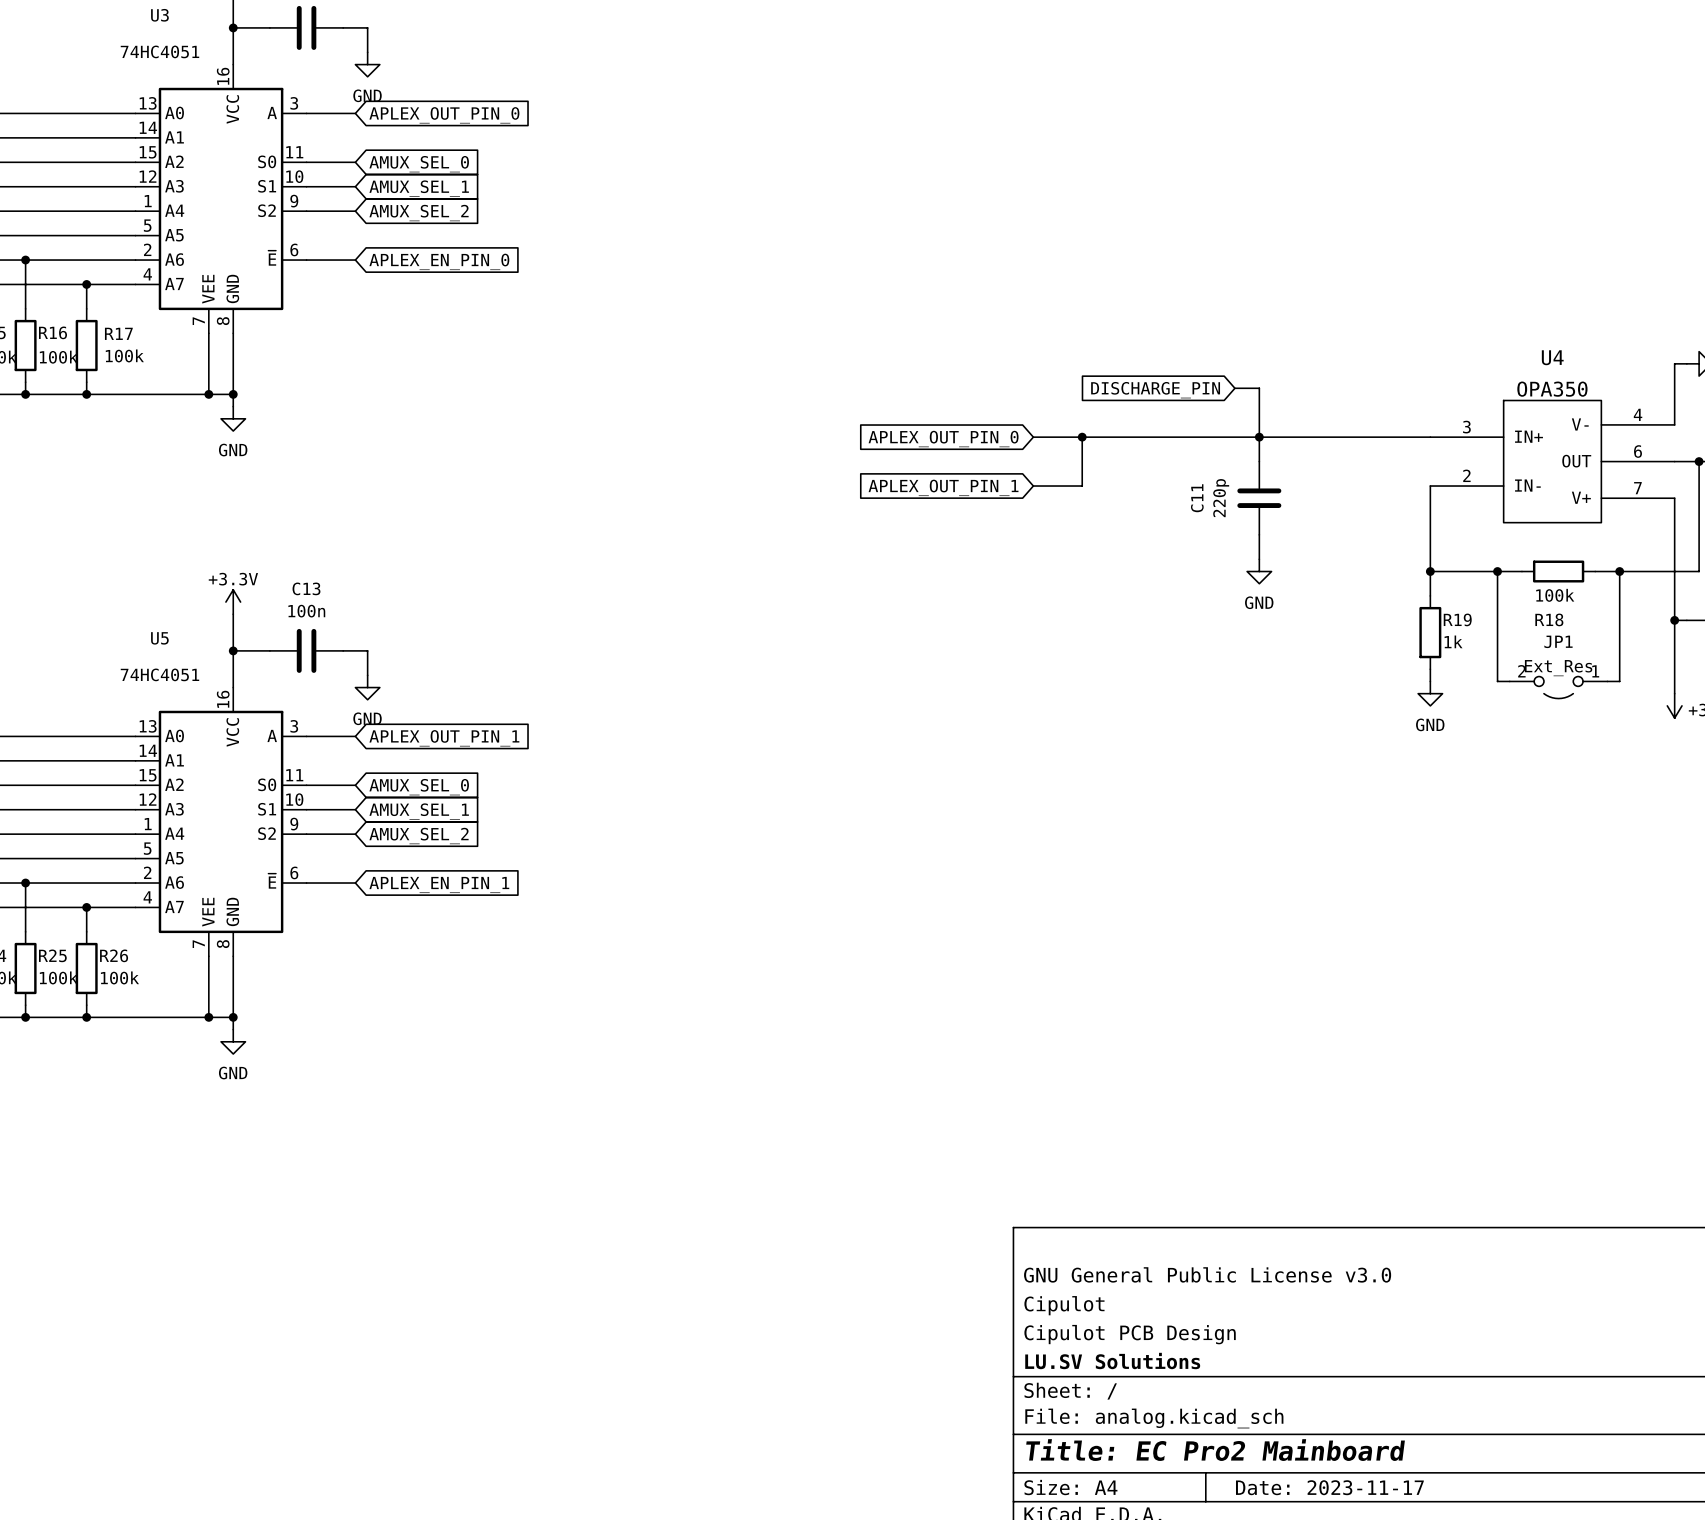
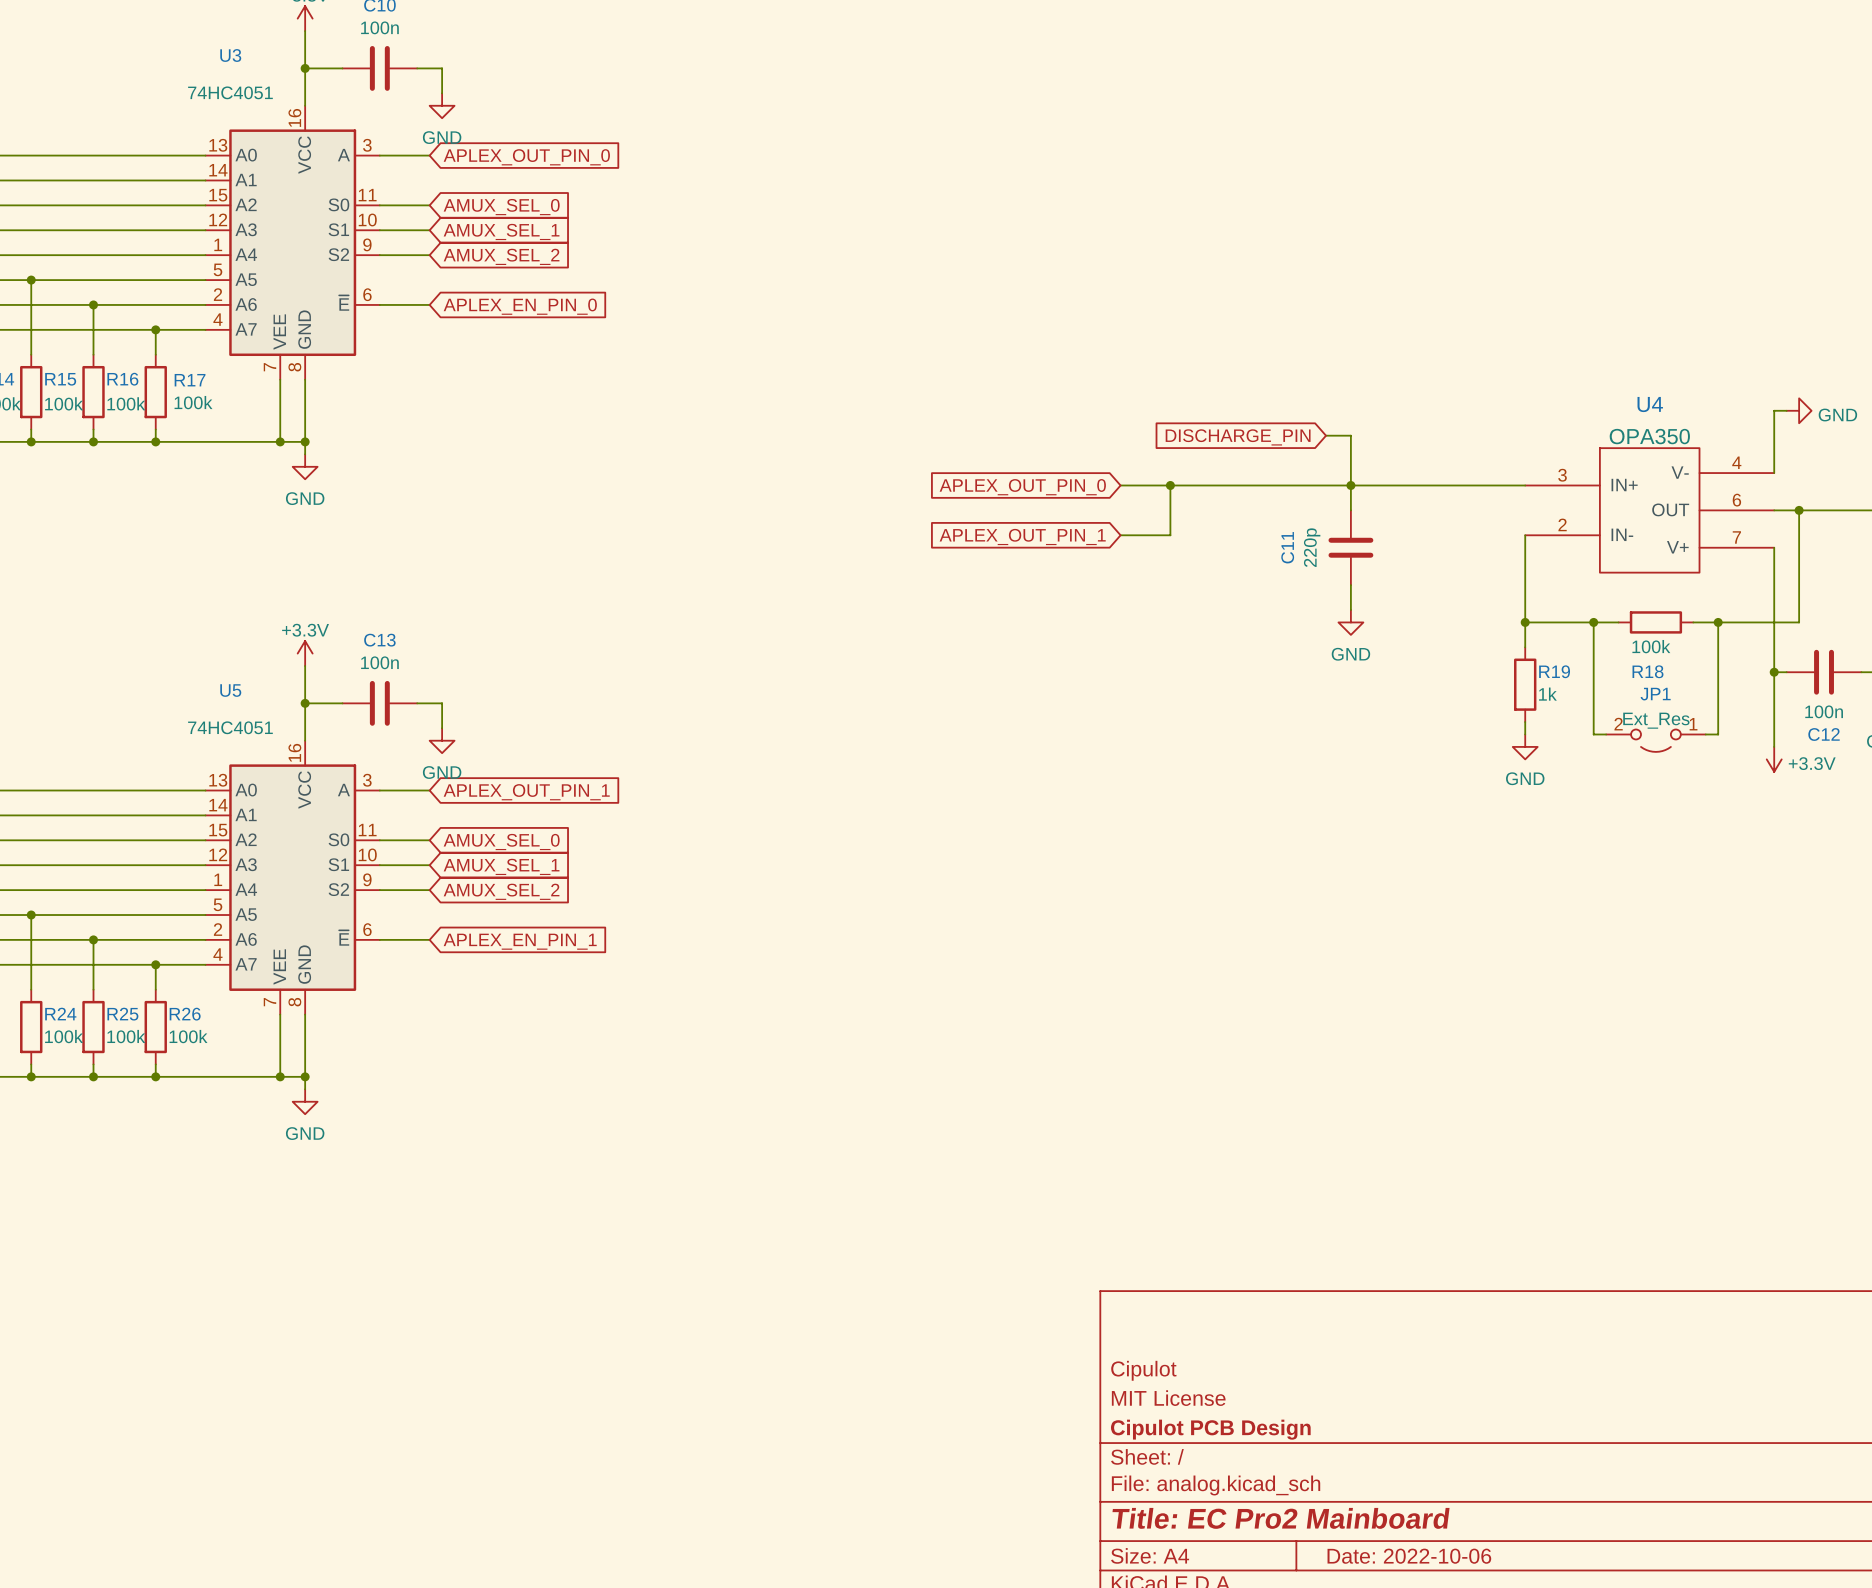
title block: GNU General Public License v3.0 (1207, 1274) -> none
title block: Cipulot PCB Design (1130, 1334) -> MIT License (1168, 1398)
title block: LU.SV Solutions (1112, 1361) -> Cipulot PCB Design (1210, 1429)
title block: Date: 2023-11-17 (1329, 1487) -> Date: 2022-10-06 (1409, 1556)

